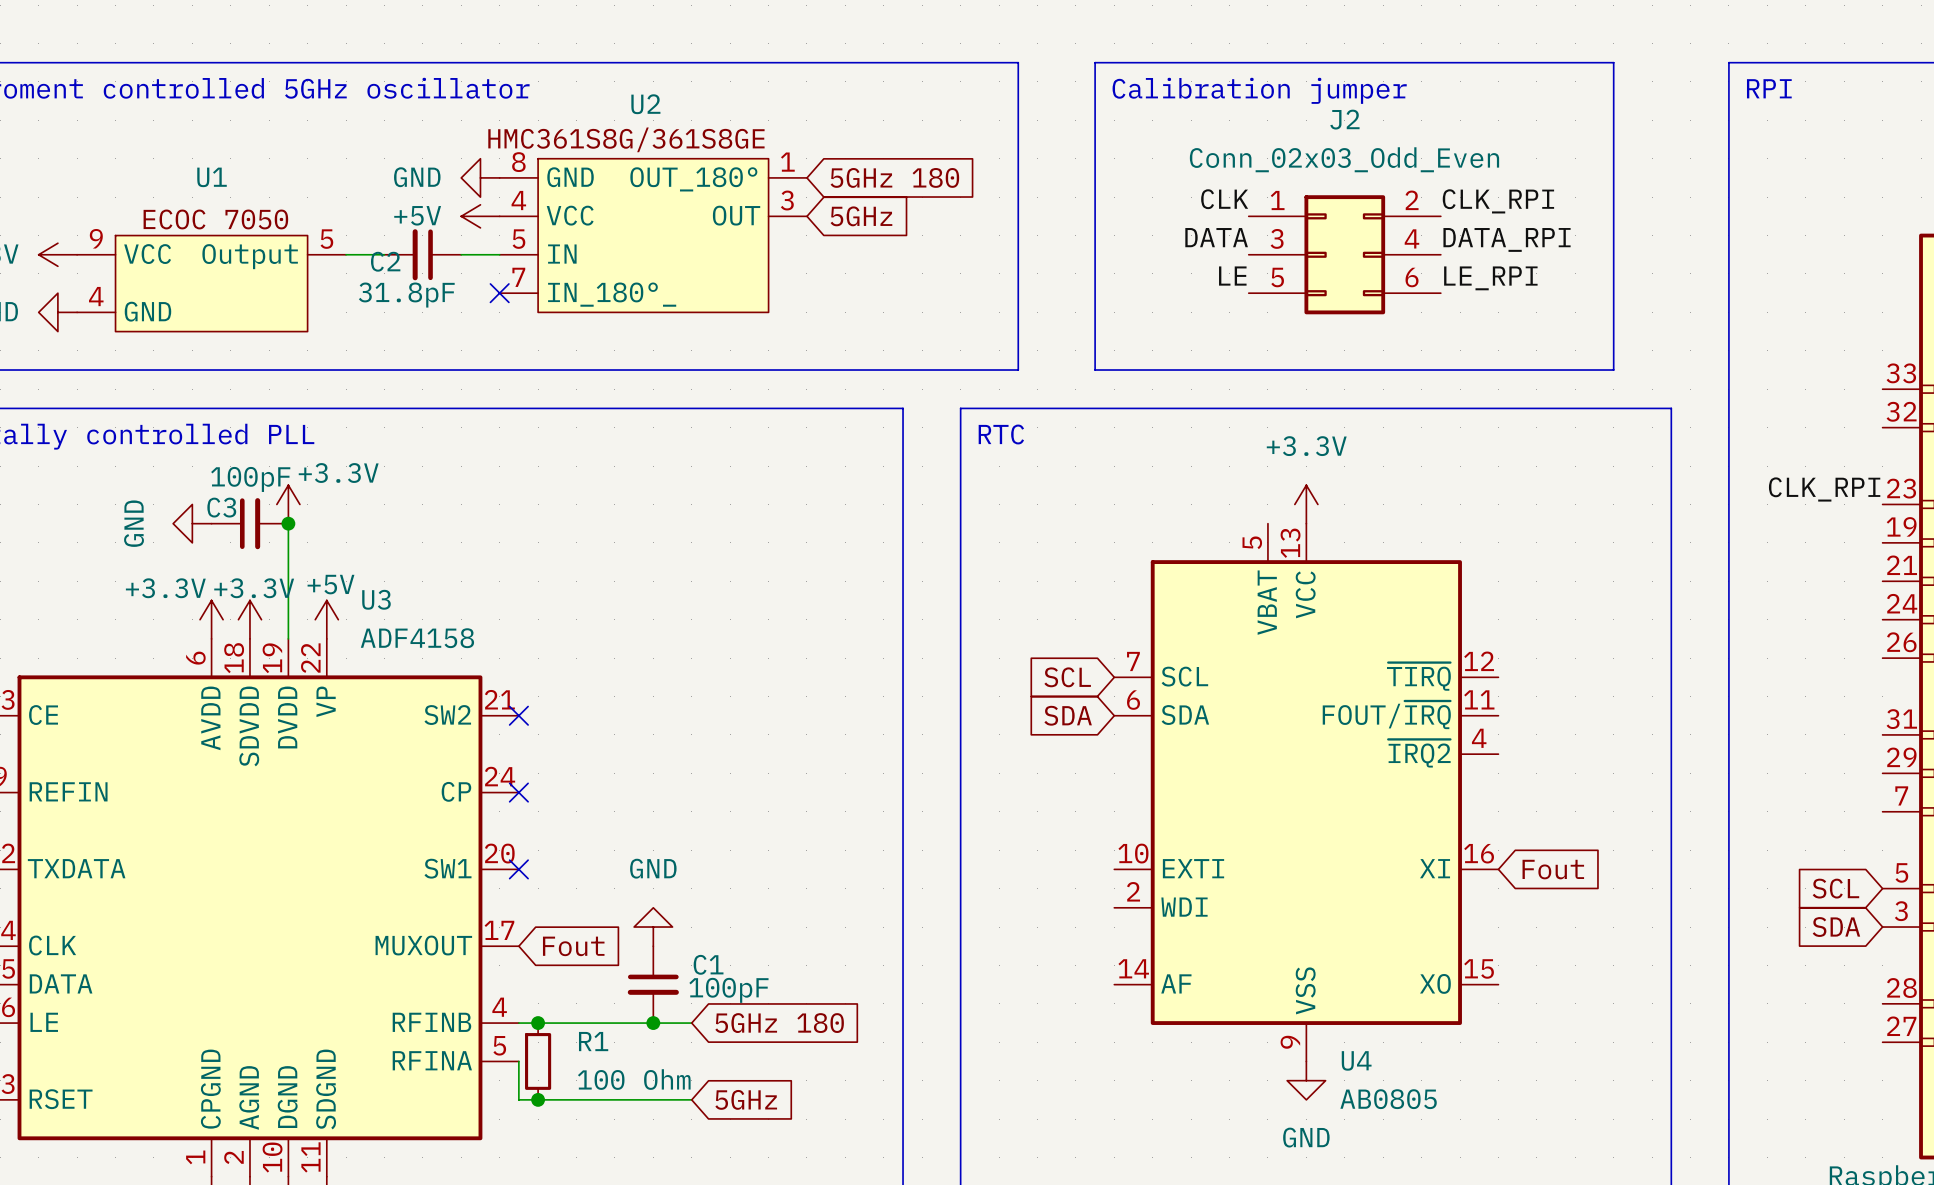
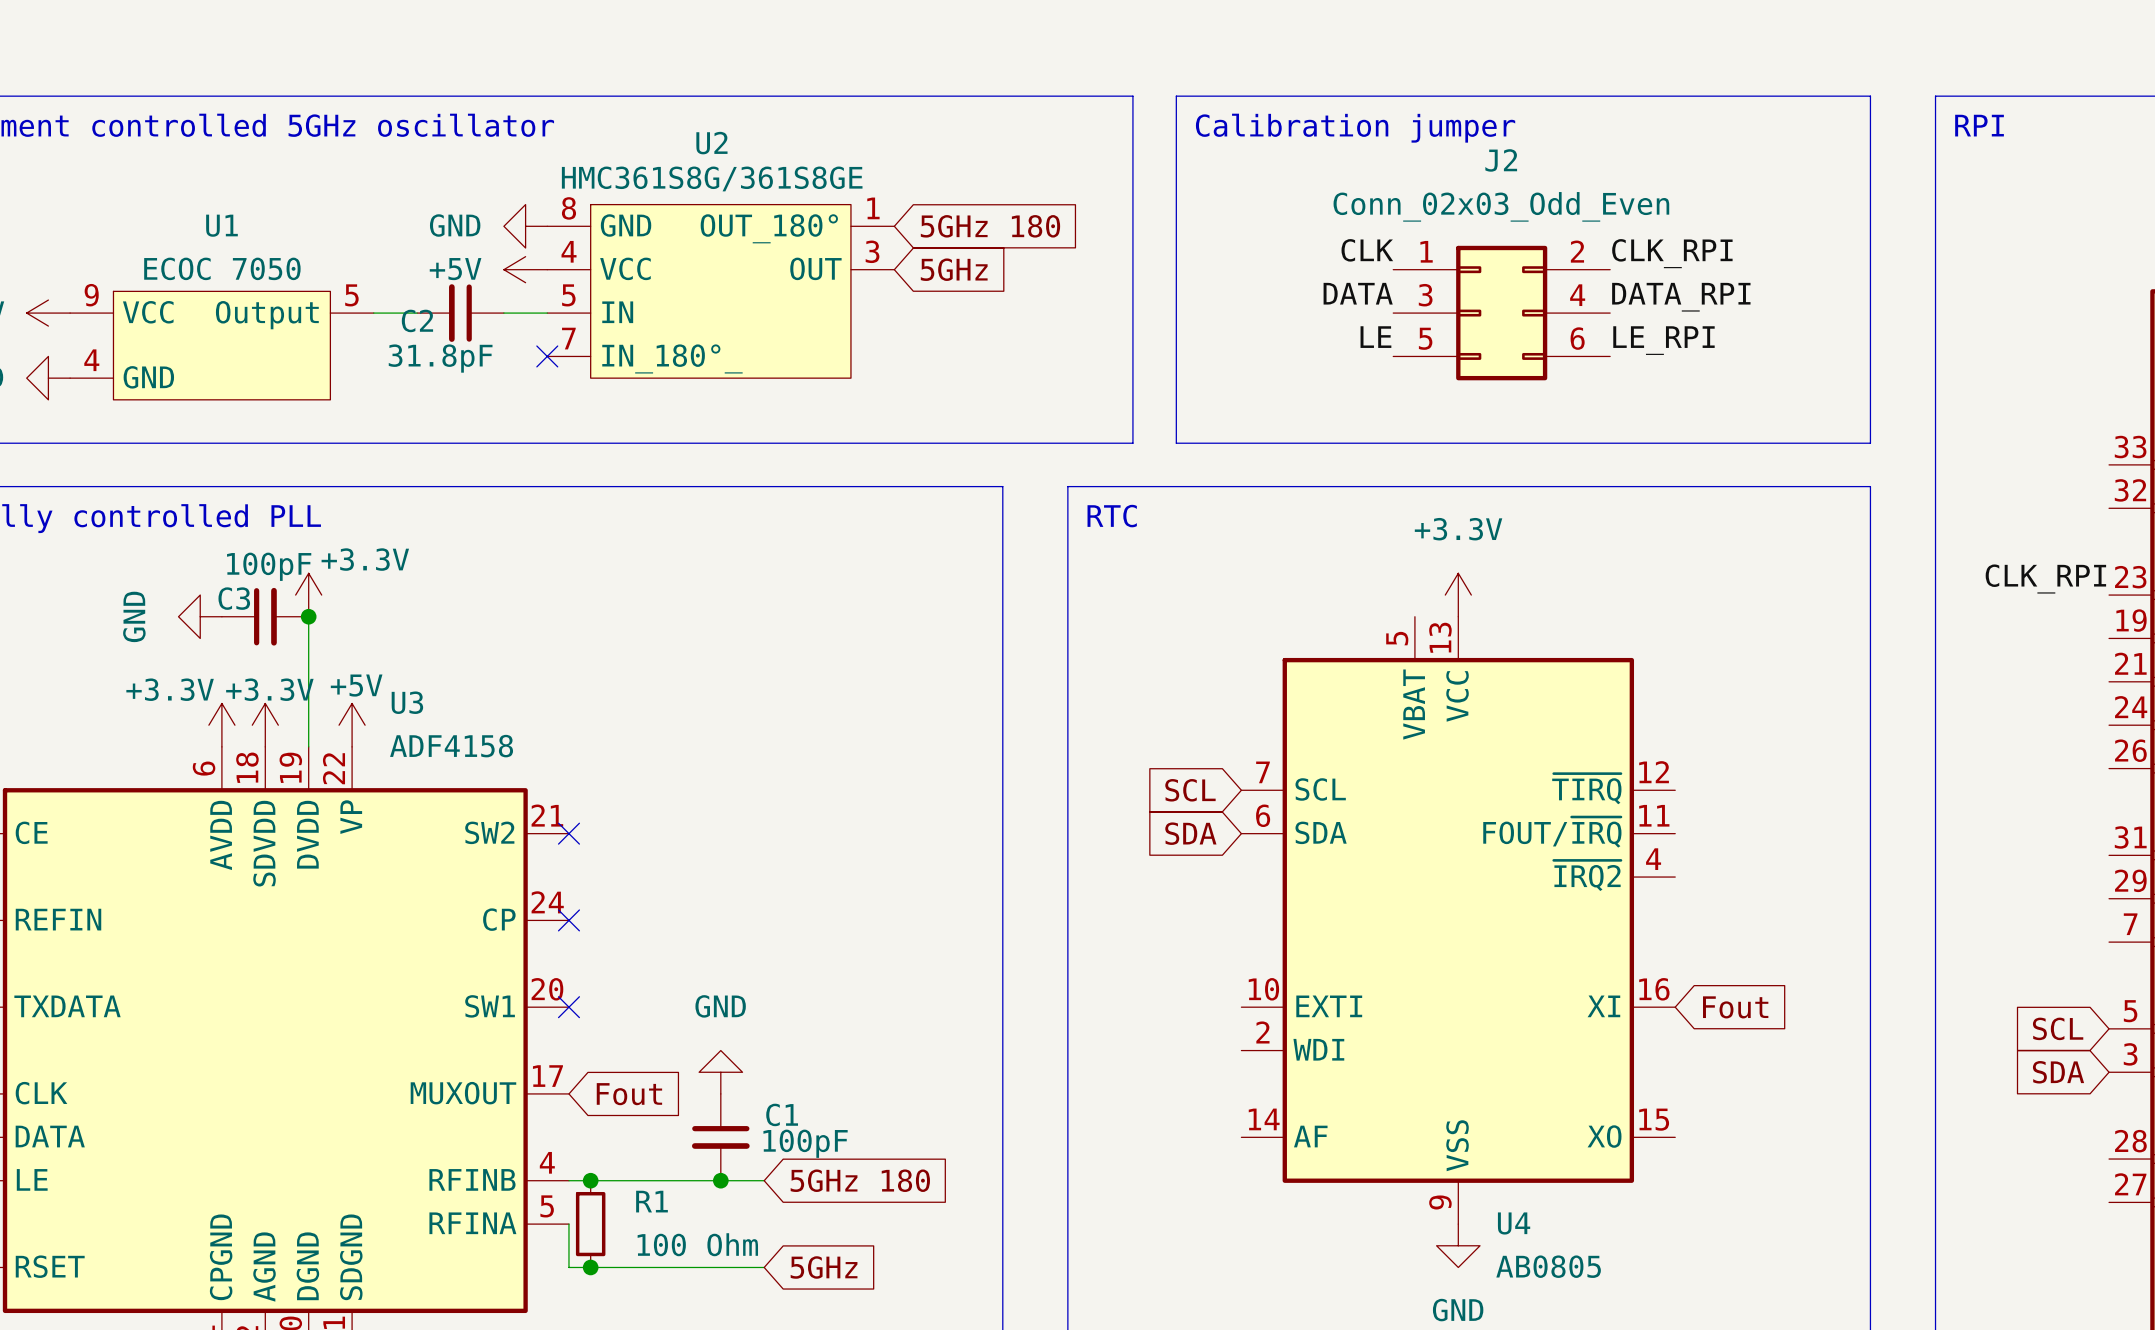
line: (1095, 62) (1095, 370) -> (1219, 96) (1176, 96) (1176, 443) (1219, 443)
line: (1613, 62) (1613, 370) -> (1805, 96) (1870, 96) (1870, 443) (1805, 443)
text position: Calibration jumper (1259, 90) -> Calibration jumper (1355, 128)
U2 value: none -> HMC361S8G/361S8GE (712, 178)
U2 text: HMC361S8G/361S8GE (626, 139) -> none
U1 value: none -> ECOC 7050 (222, 268)
U1 text: ECOC 7050 (215, 219) -> none

